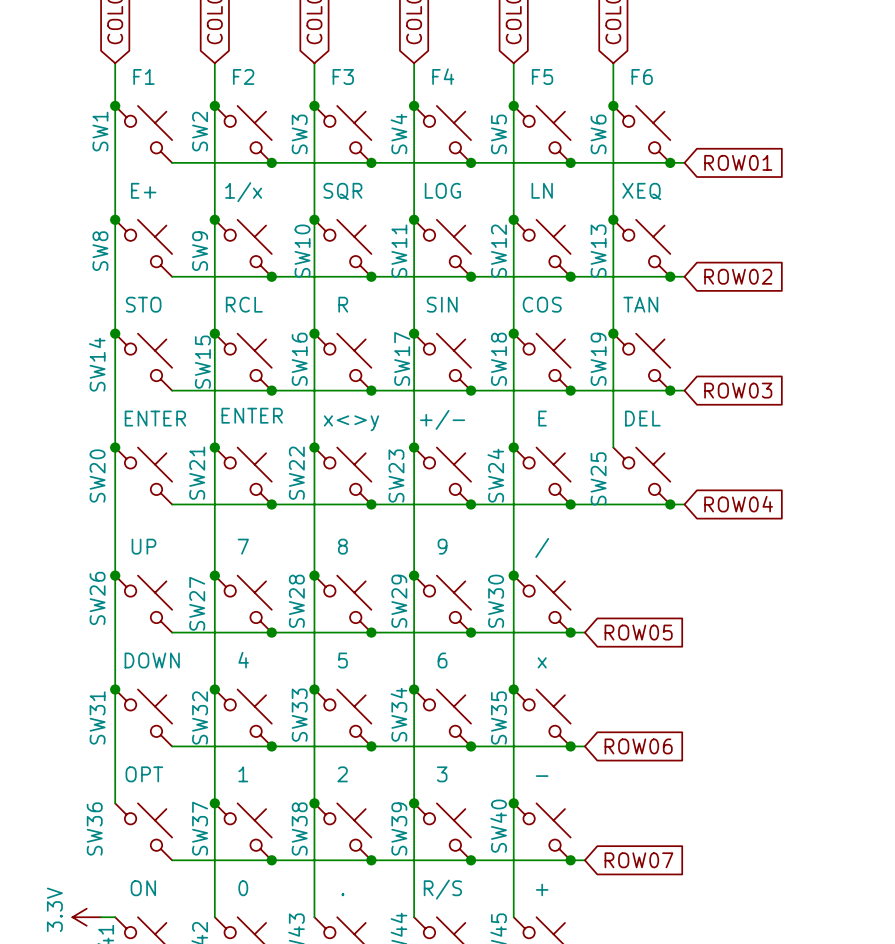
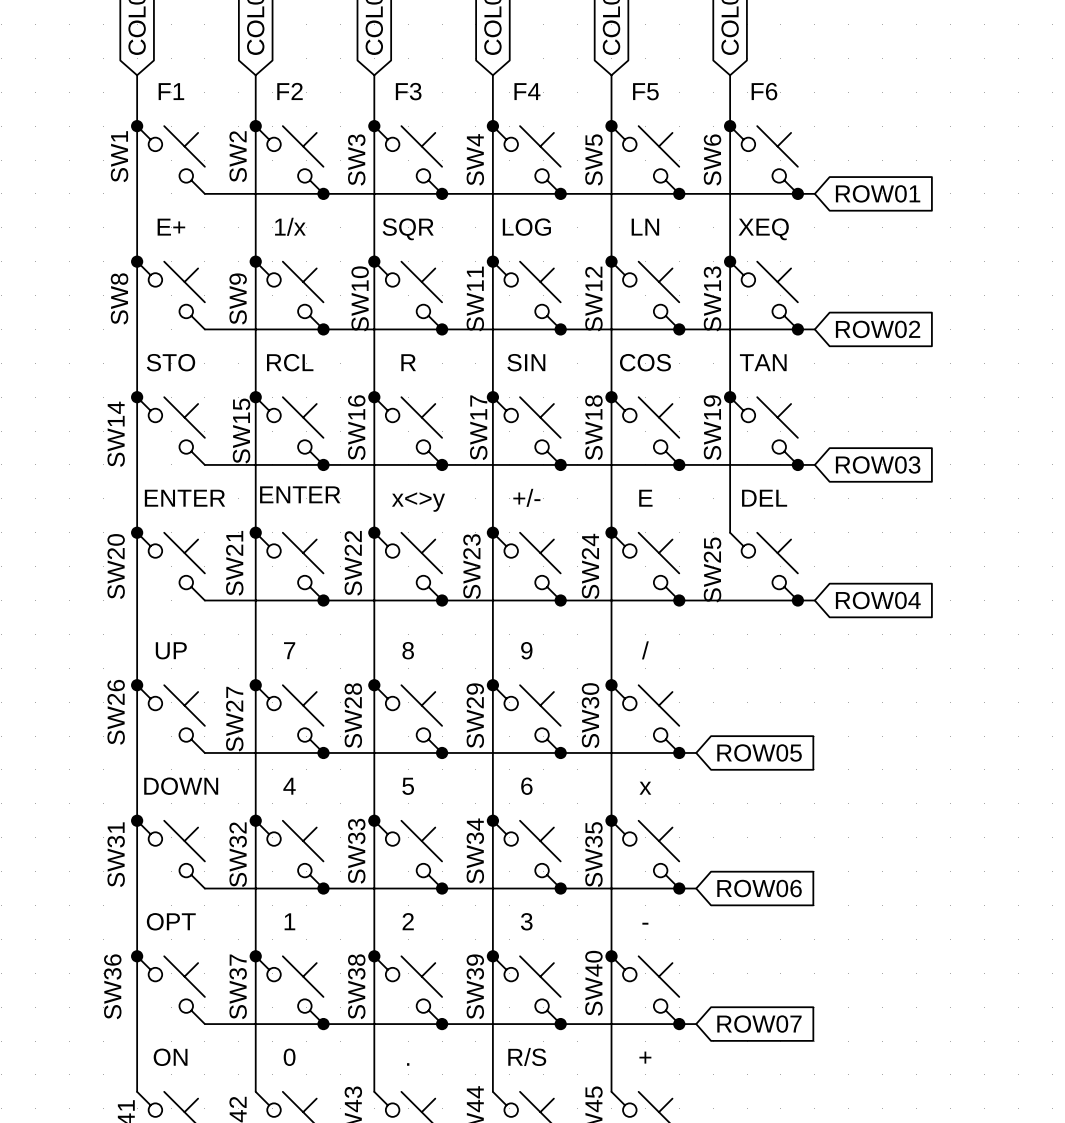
junction: none -> (137, 956)
power symbol: 3.3V (86, 917) -> none
wire: (100, 917) (115, 917) -> (137, 956) (137, 1091)

